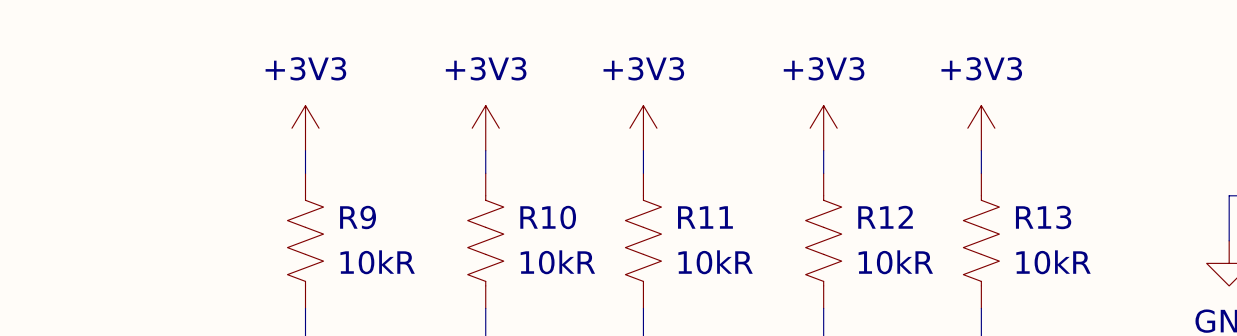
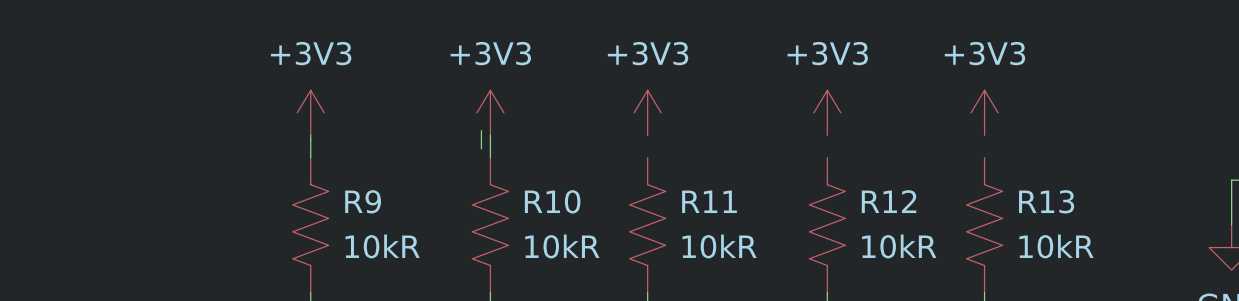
wire: none -> (481, 130) (481, 148)
wire: (643, 150) (643, 173) -> none
wire: (823, 150) (823, 173) -> none
wire: (981, 150) (981, 173) -> none

